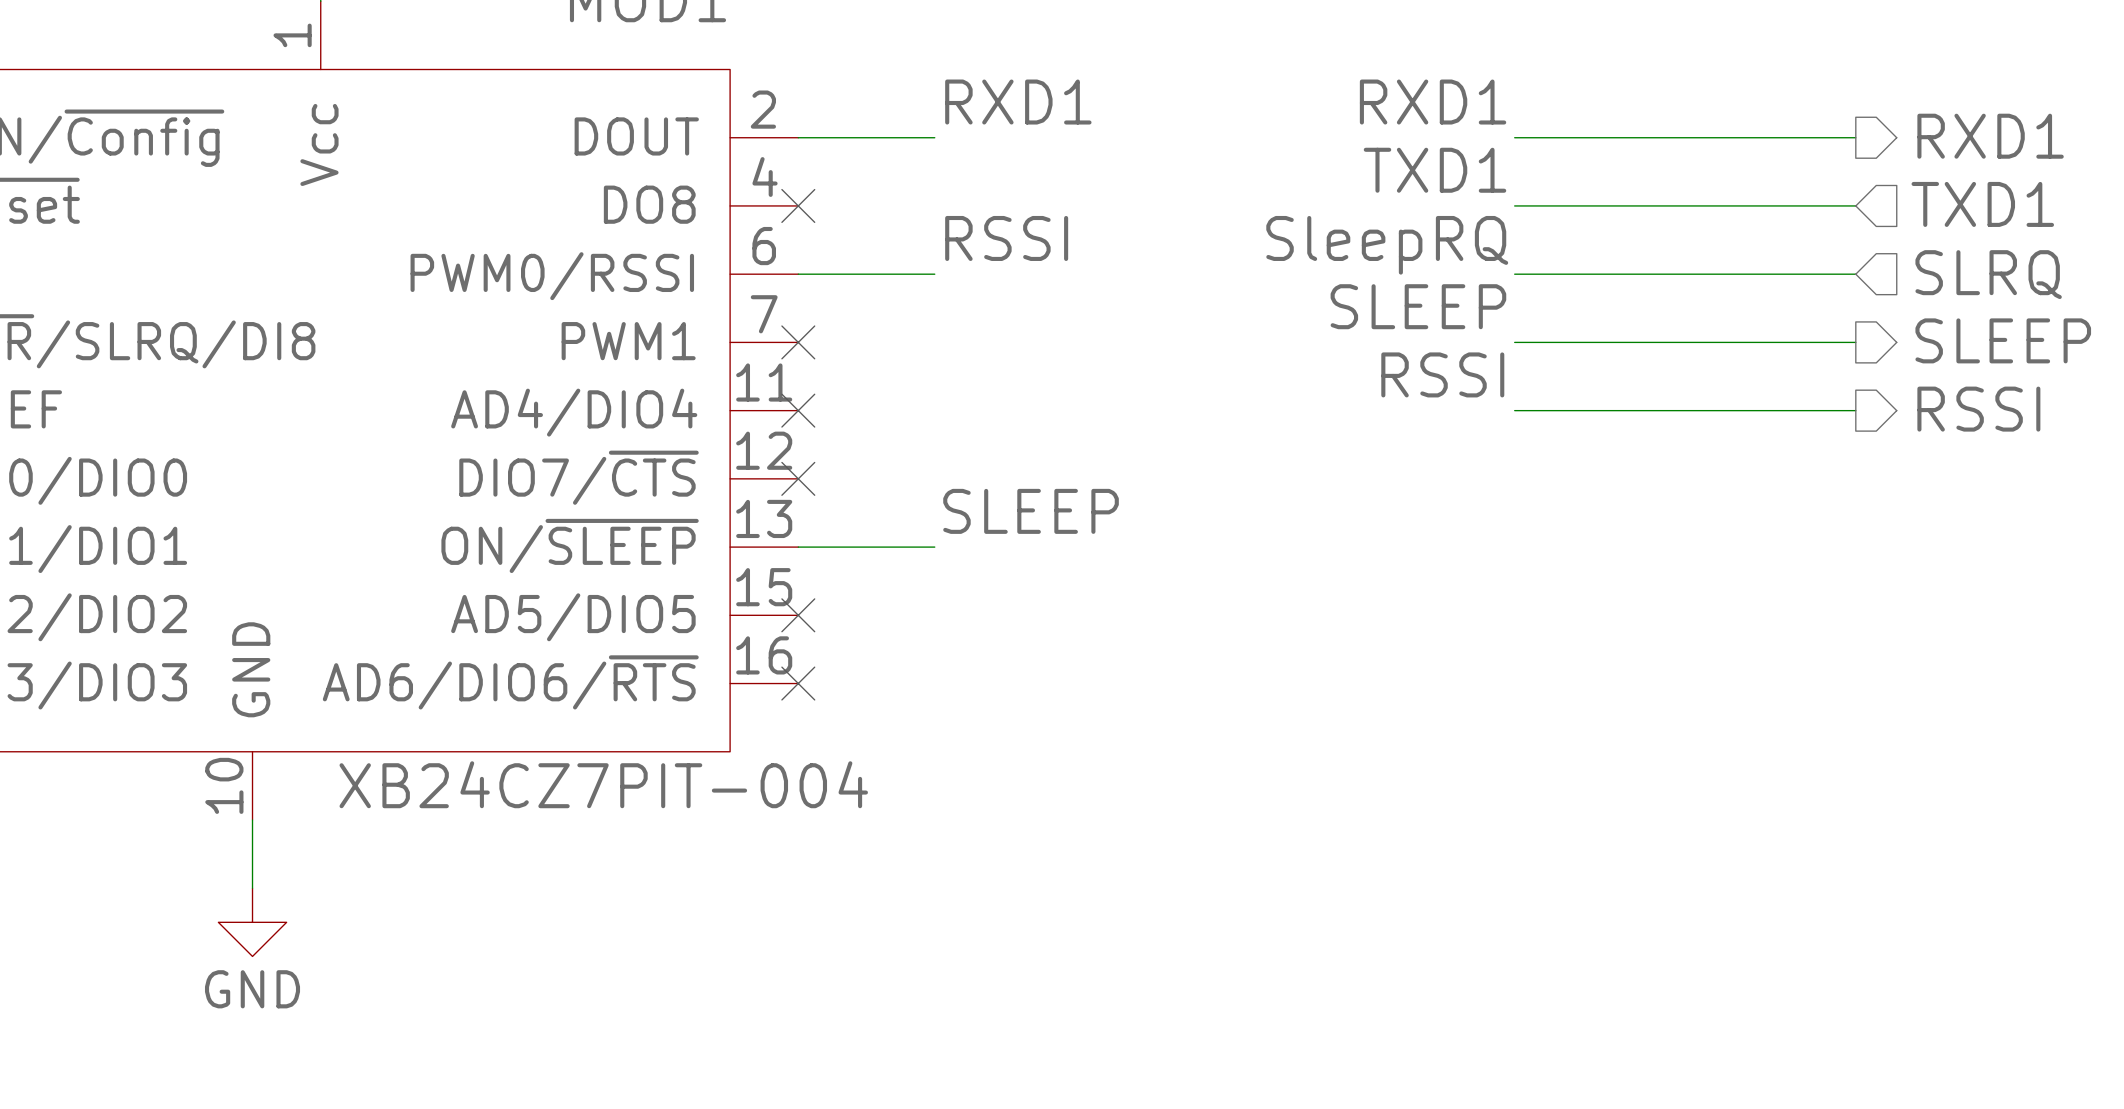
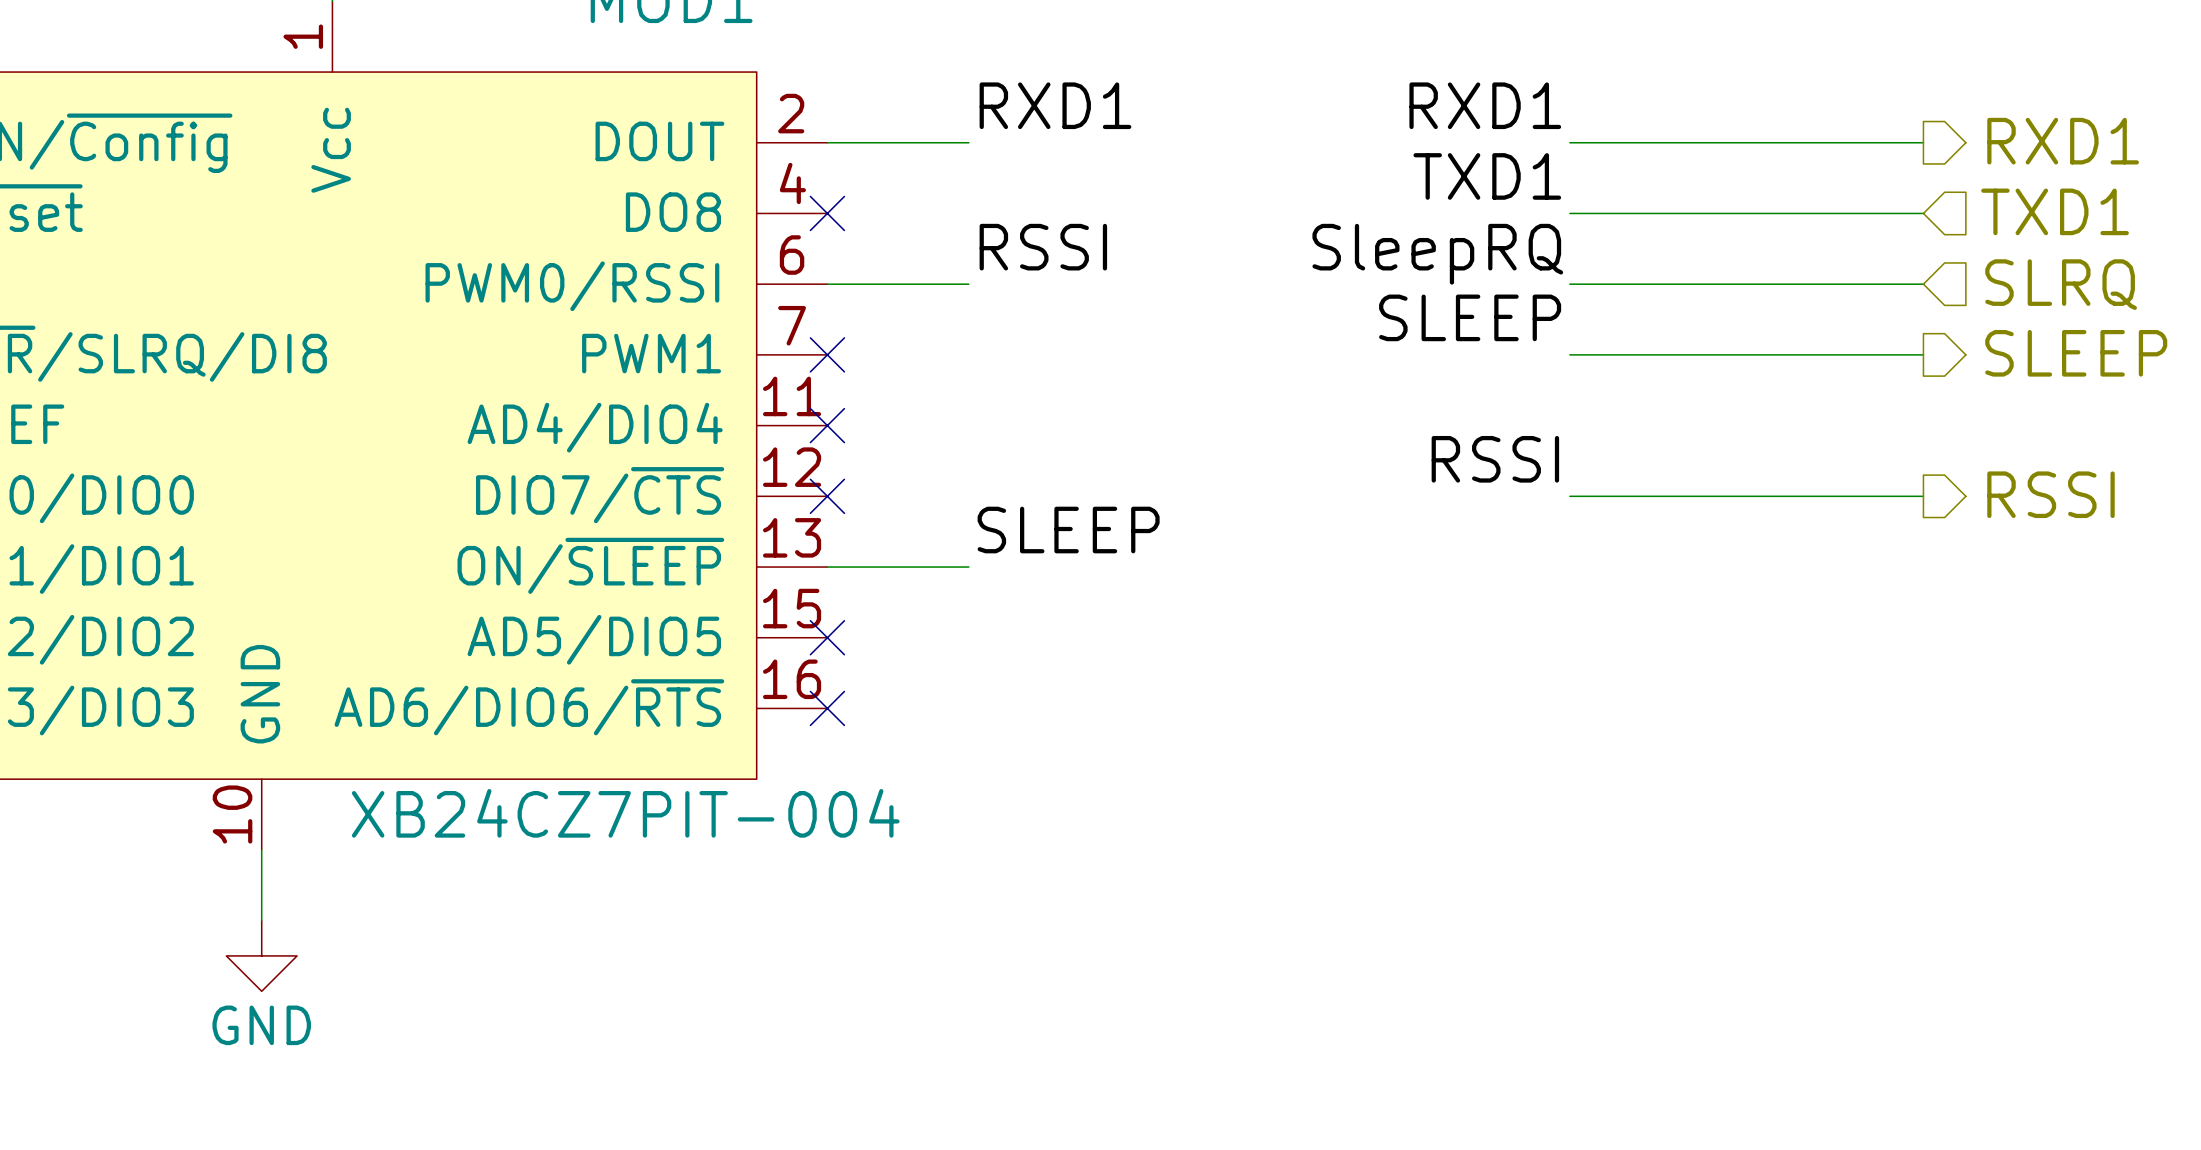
label position: RSSI (1442, 374) -> RSSI (1495, 459)
hierarchical label position: RSSI (1978, 409) -> RSSI (2050, 494)
wire: (1514, 410) (1855, 410) -> (1569, 496) (1923, 496)

